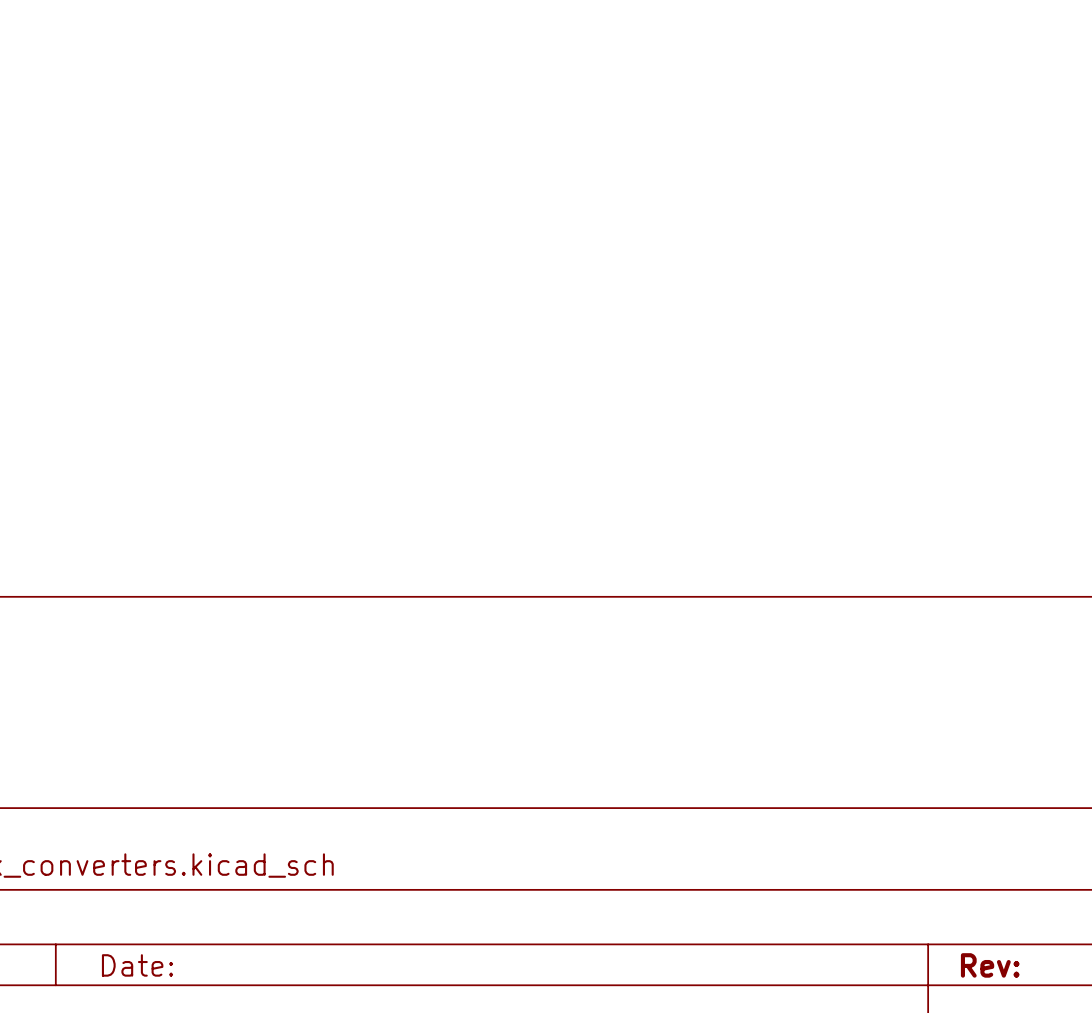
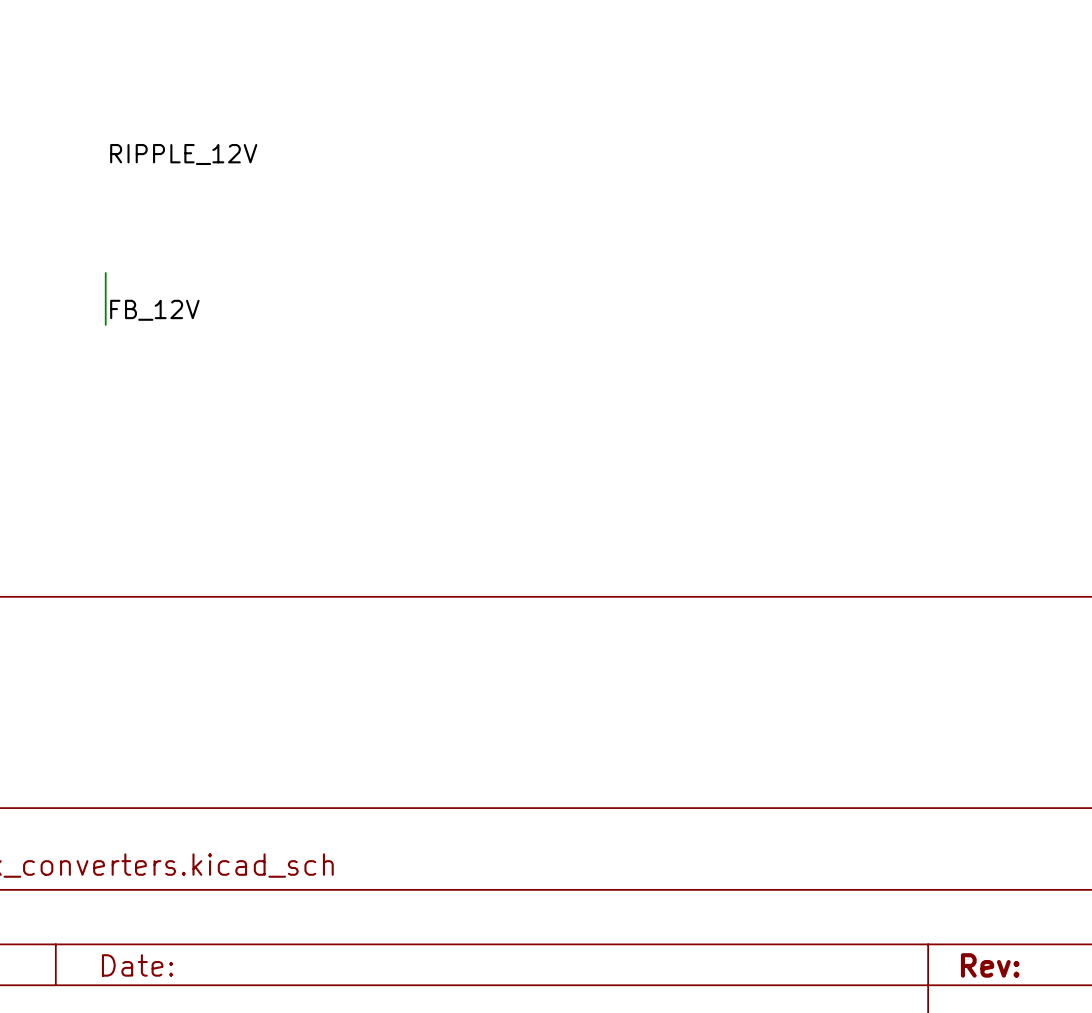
label: none -> RIPPLE_12V (183, 154)
wire: none -> (105, 272) (105, 324)
label: none -> FB_12V (154, 310)

